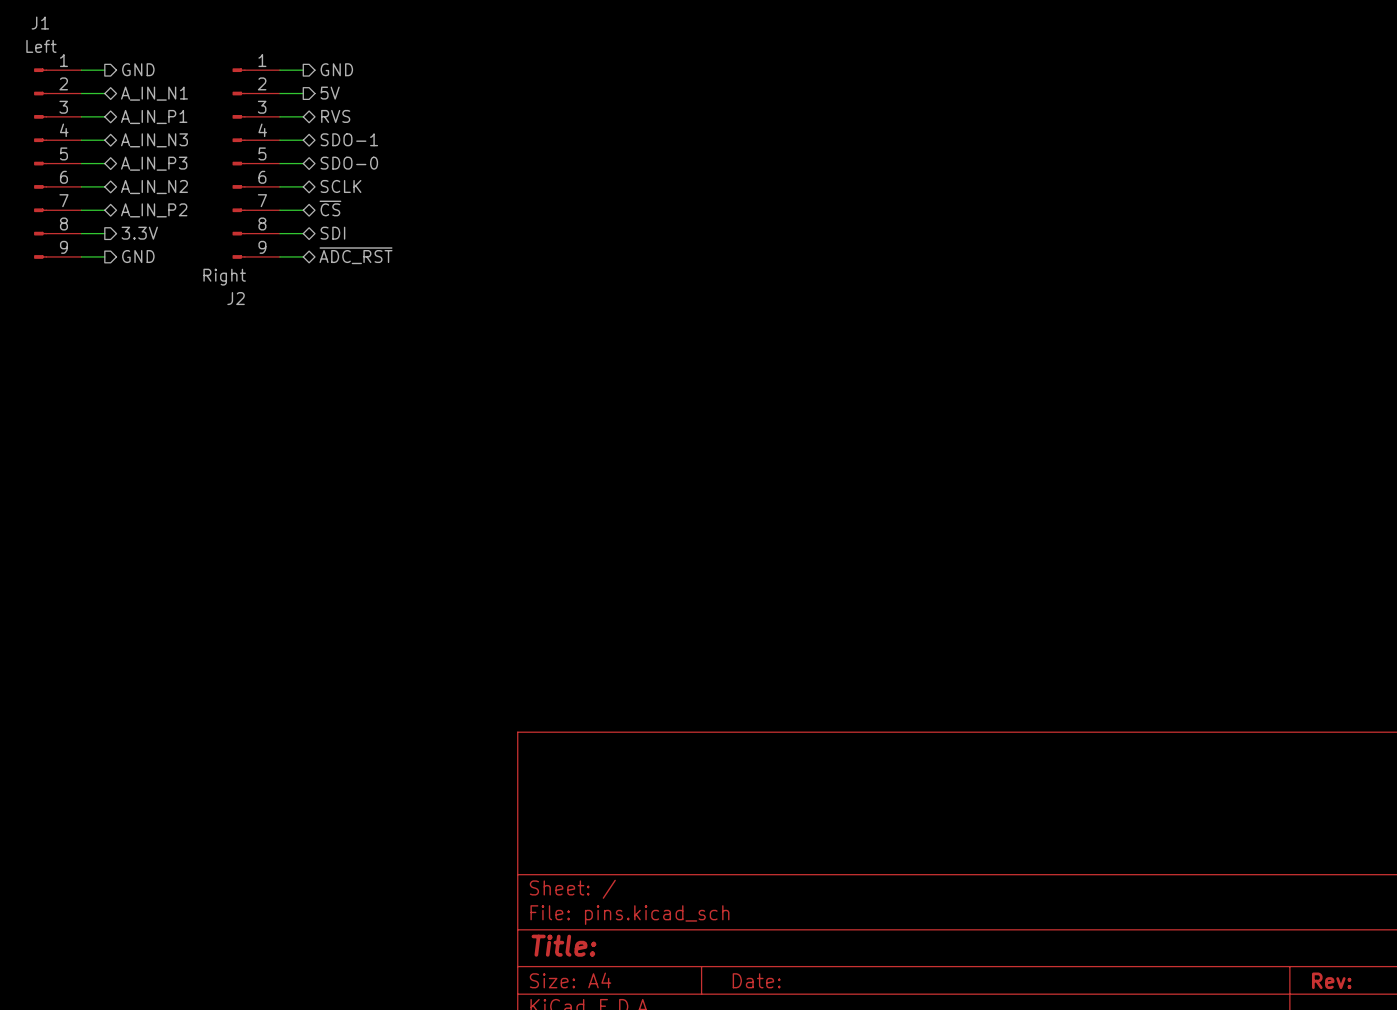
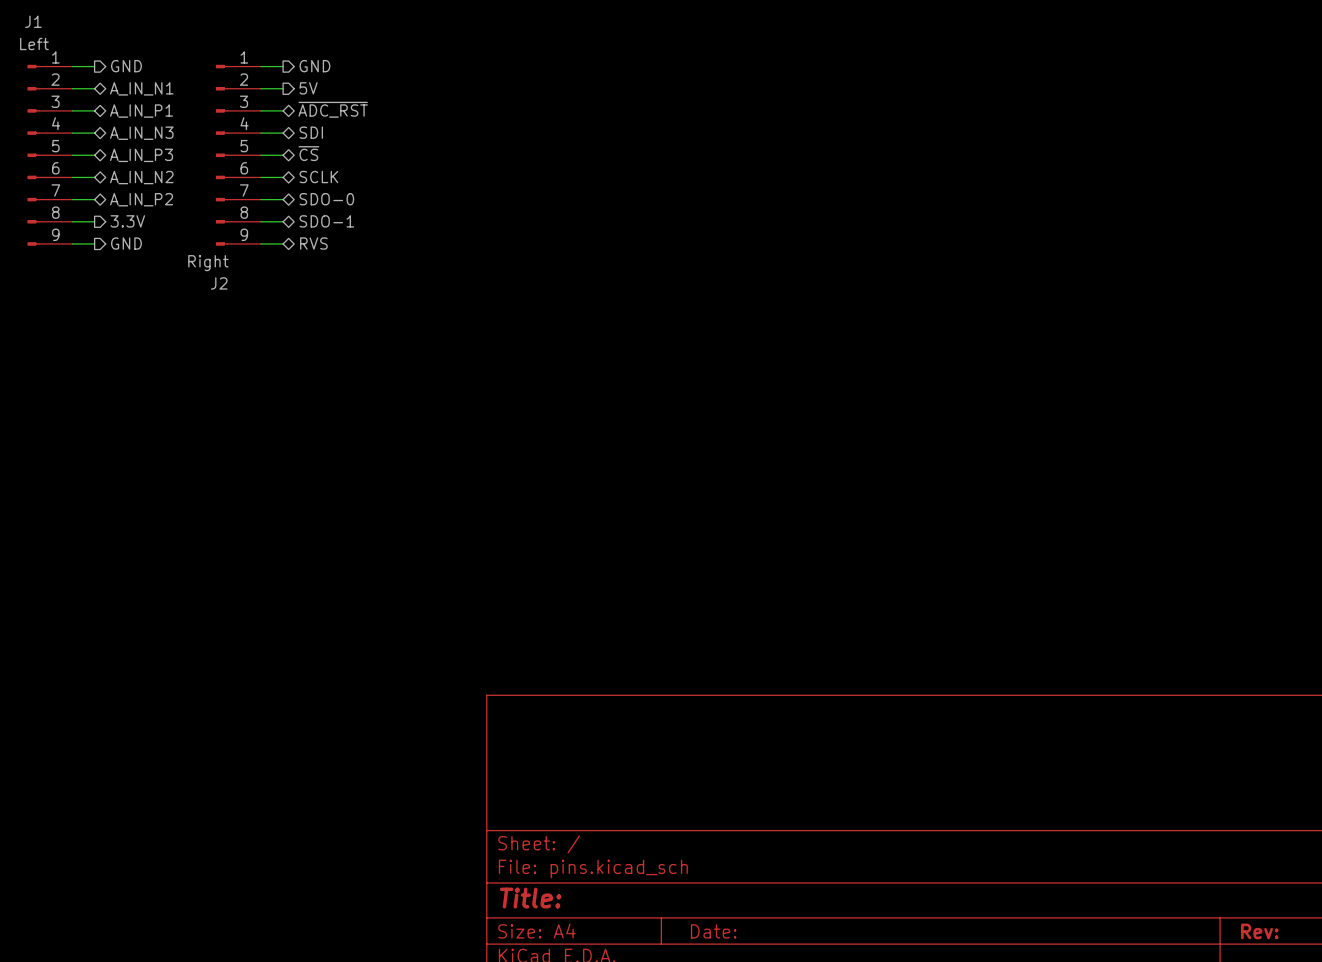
hierarchical label: RVS (335, 116) -> ~{ADC_RST} (333, 109)
hierarchical label: SDO-1 (349, 139) -> SDI (311, 132)
hierarchical label: SDO-0 (349, 163) -> ~{CS} (308, 153)
hierarchical label: ~{CS} (330, 208) -> SDO-0 (326, 199)
hierarchical label: SDI (332, 233) -> SDO-1 (326, 221)
hierarchical label: ~{ADC_RST} (356, 255) -> RVS (313, 243)

